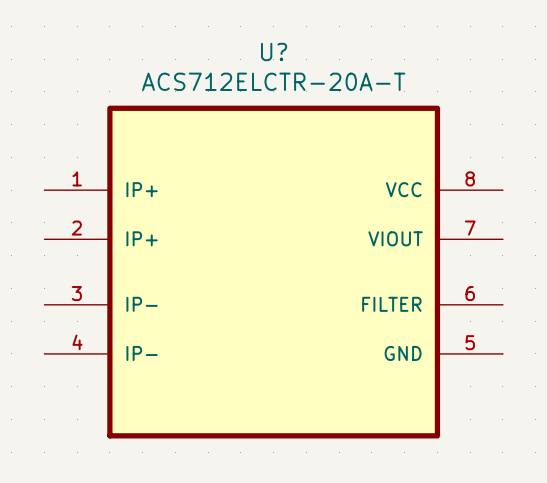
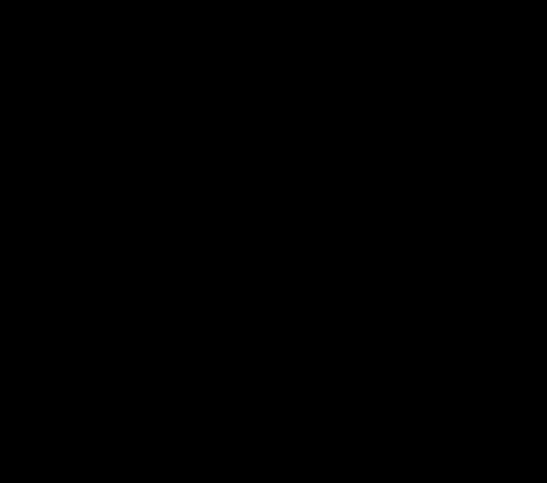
U?: ACS712ELCTR-20A-T (273, 272) -> none

